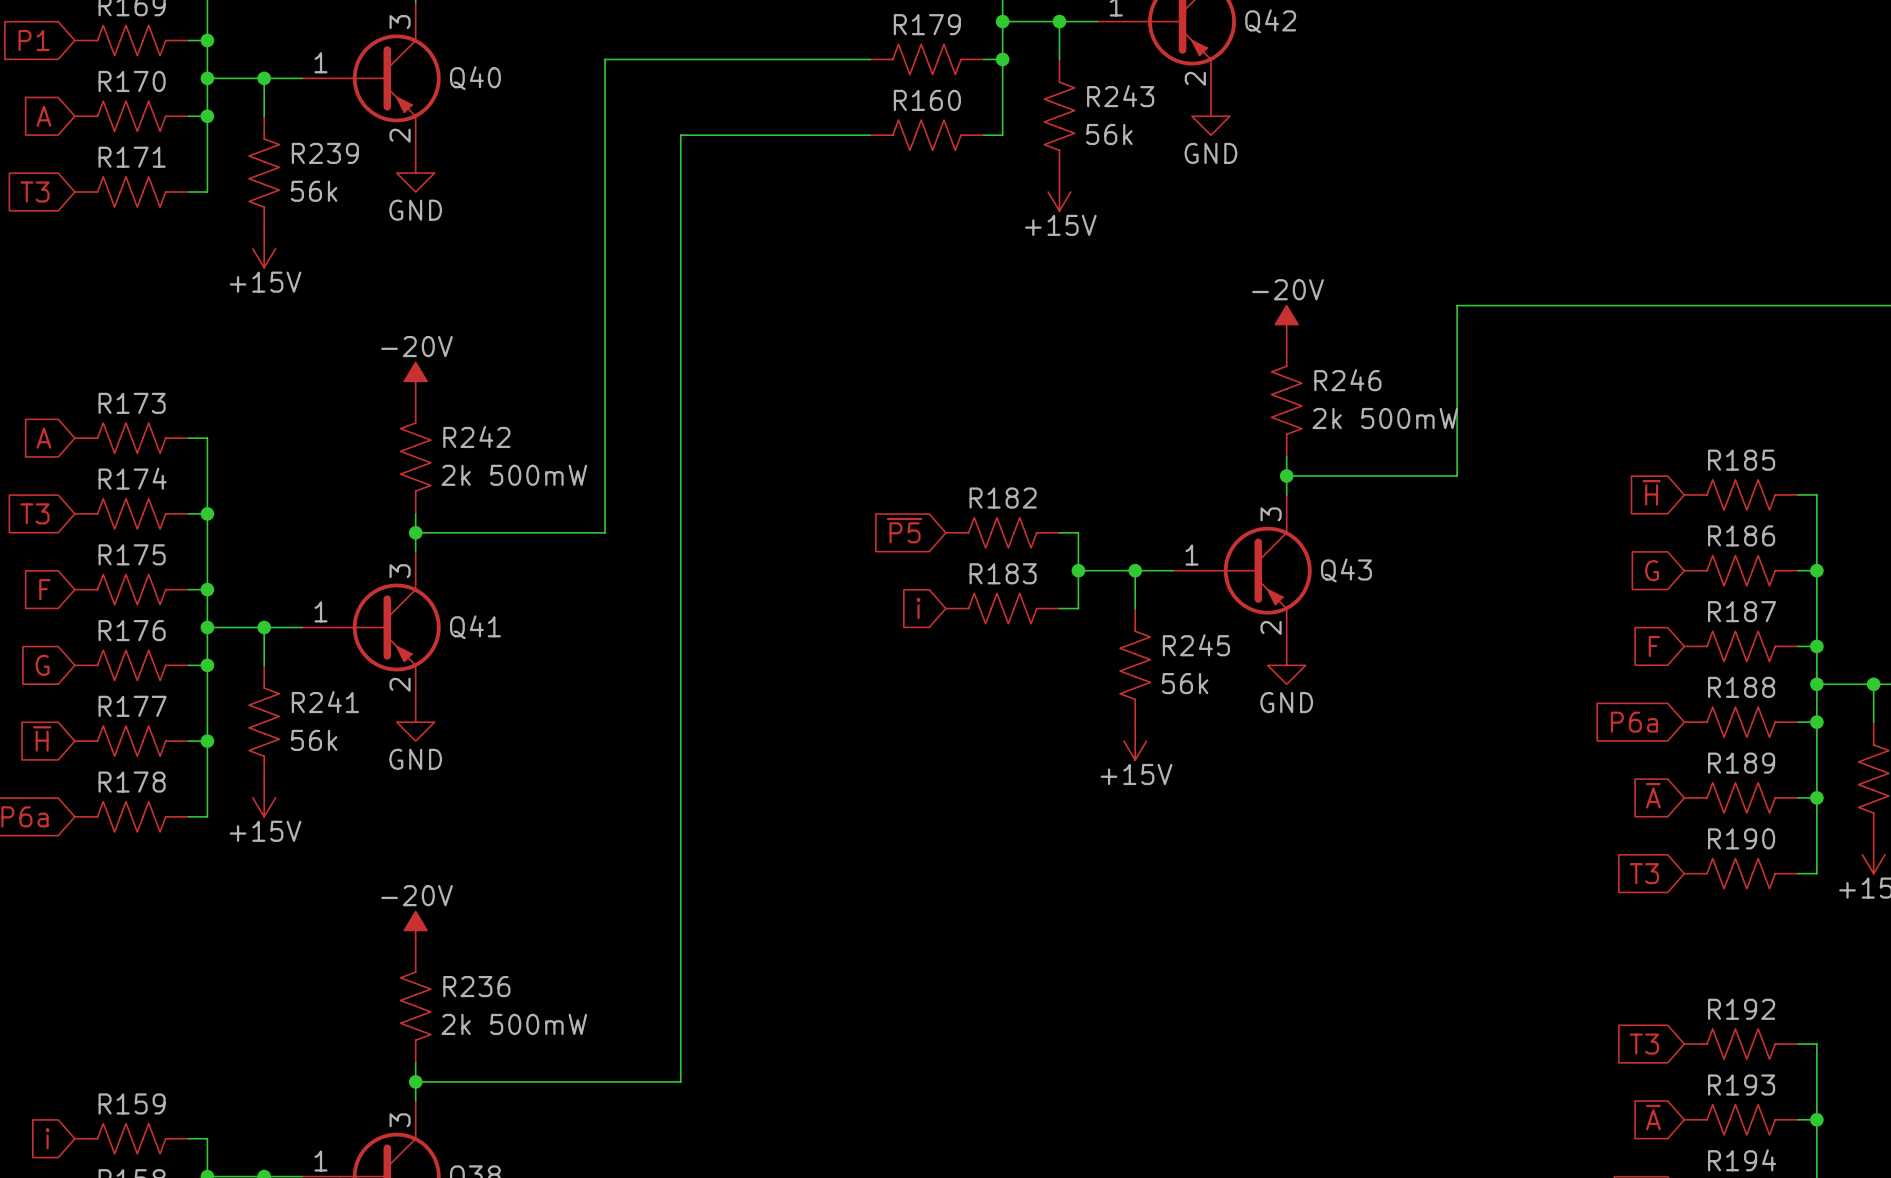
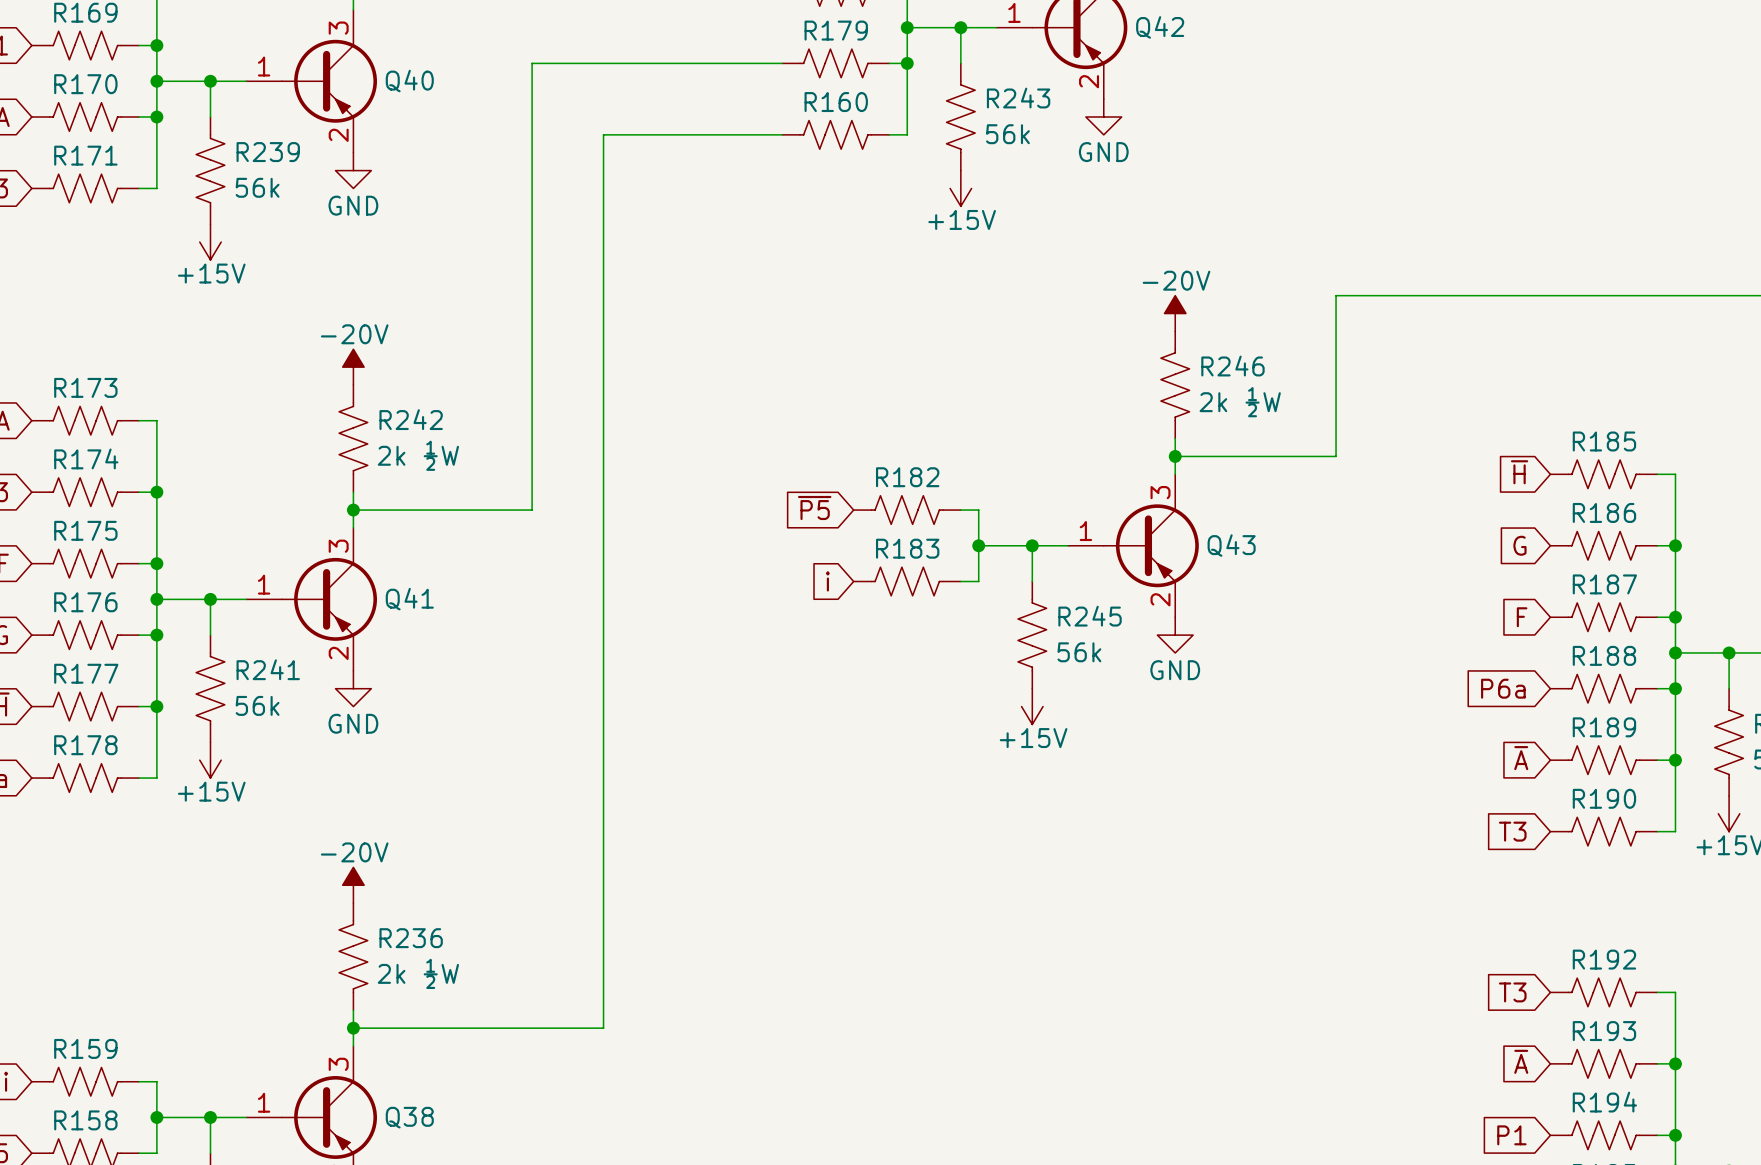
R246 value: 2k 500mW (1385, 418) -> 2k ½W (1240, 402)
R242 value: 2k 500mW (514, 475) -> 2k ½W (418, 455)
R236 value: 2k 500mW (514, 1024) -> 2k ½W (418, 973)

